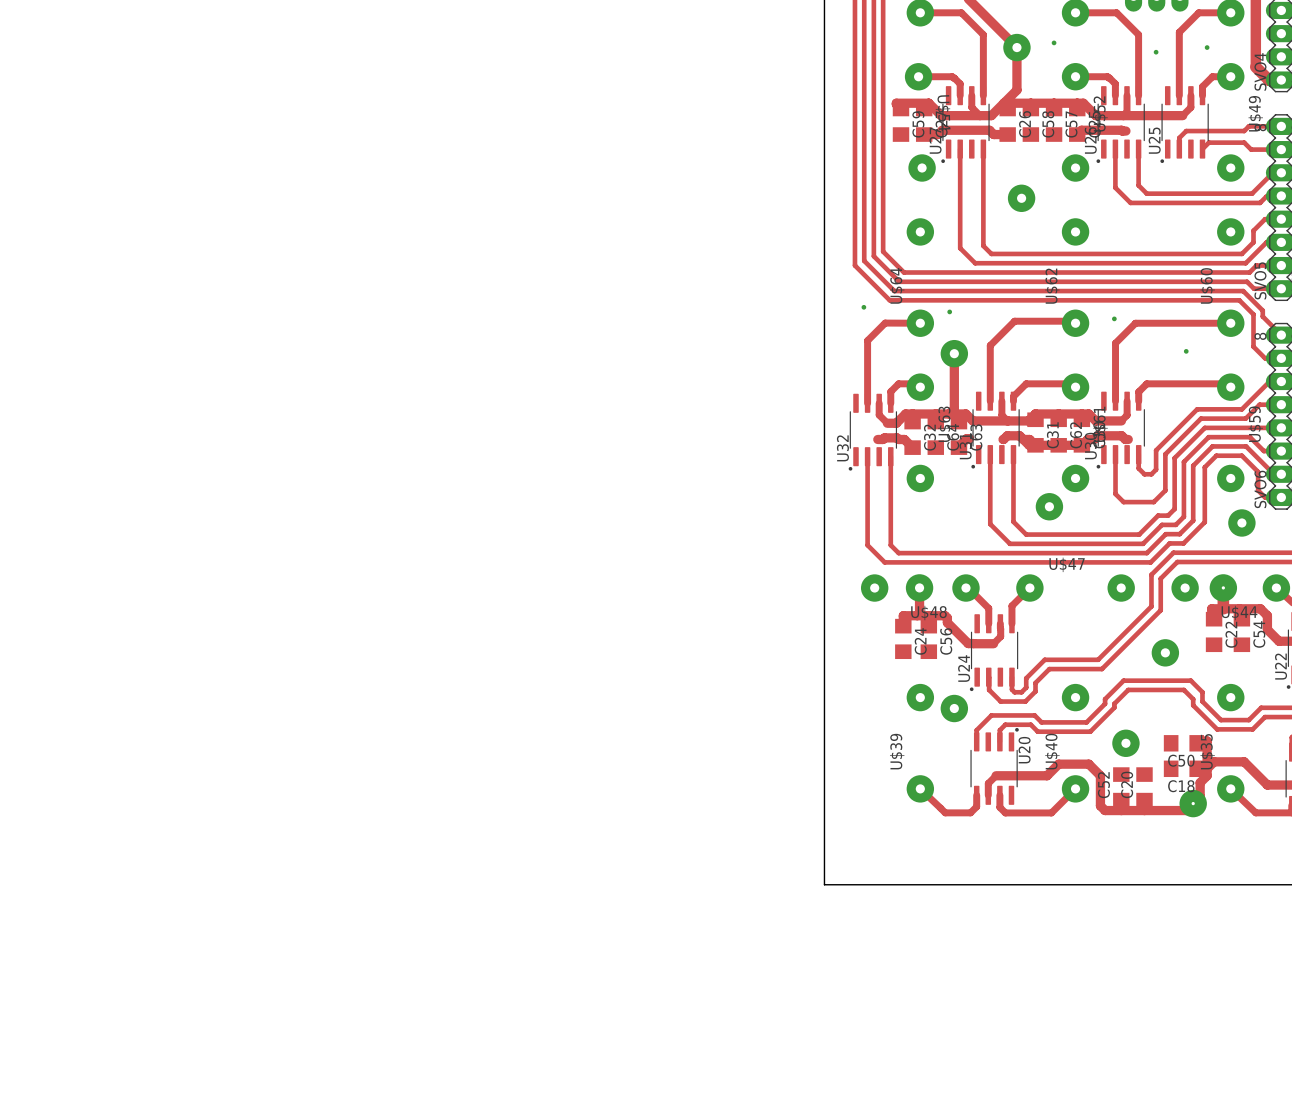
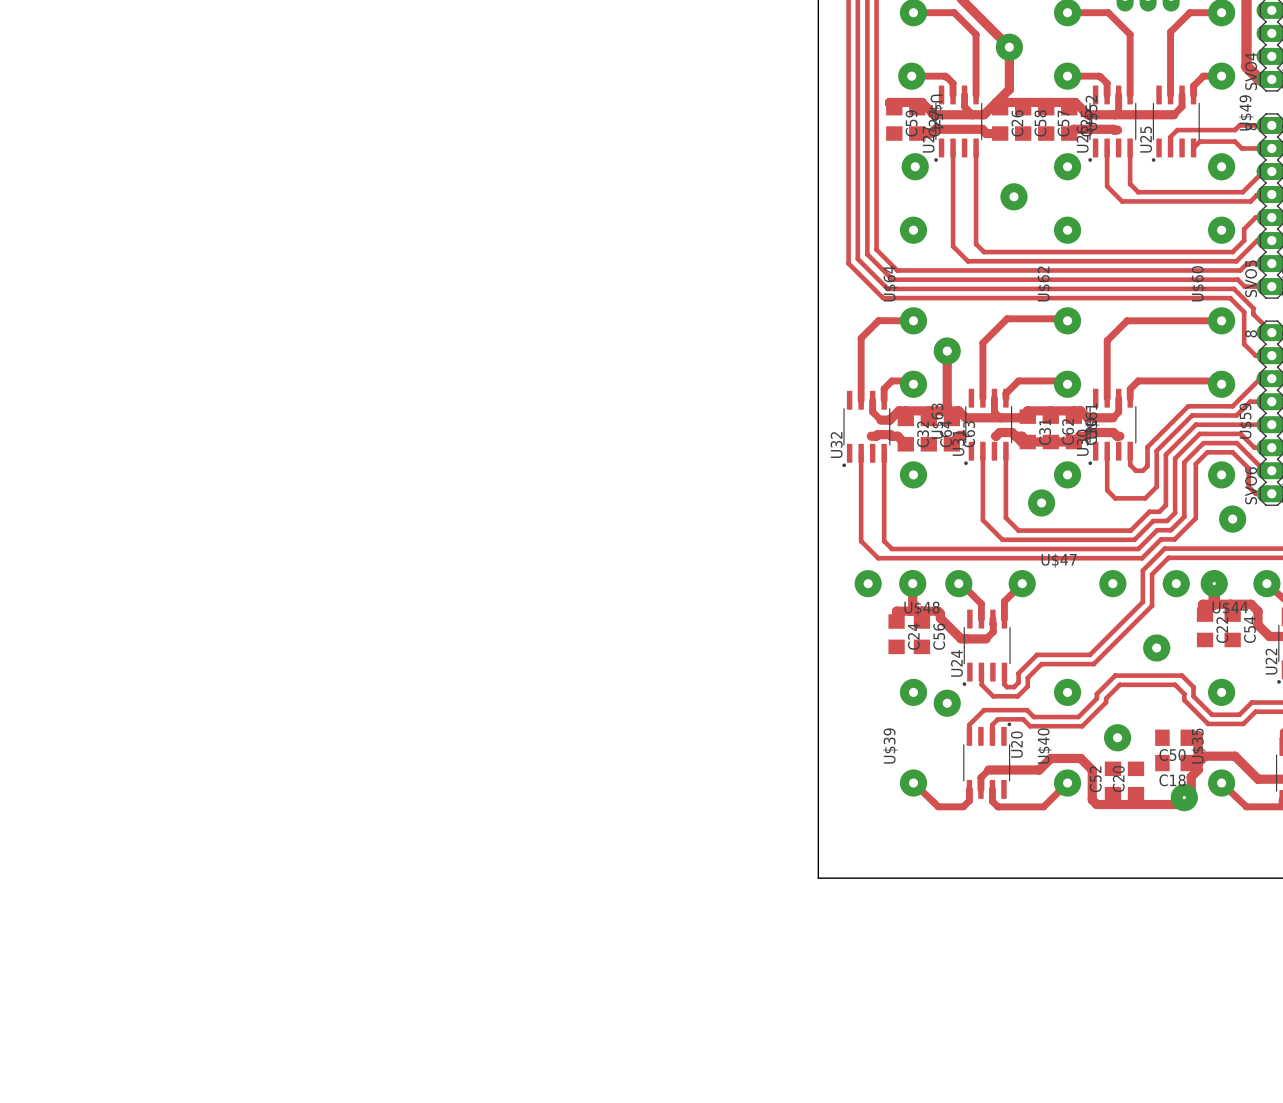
via: (1054, 42) -> none
via: (1207, 47) -> none
via: (1156, 52) -> none
via: (863, 307) -> none
via: (949, 311) -> none
via: (1114, 318) -> none
via: (1186, 351) -> none

